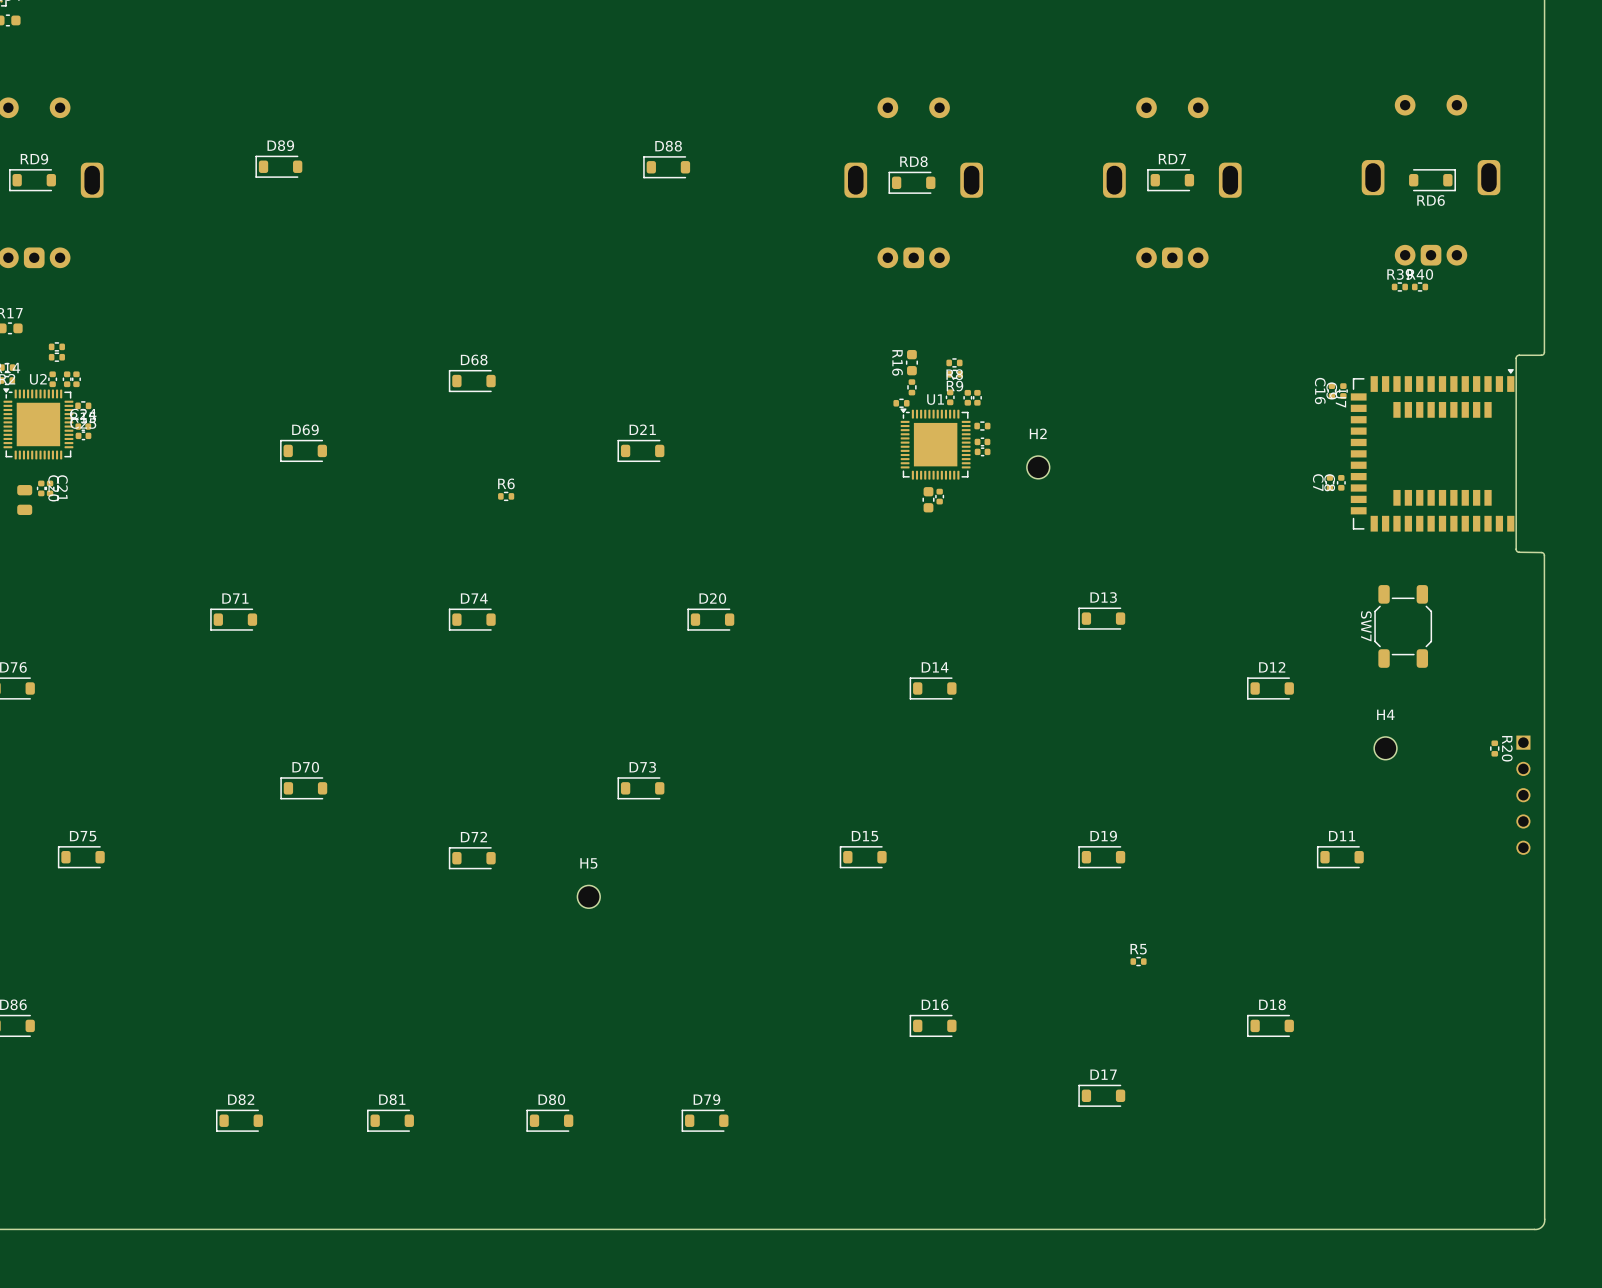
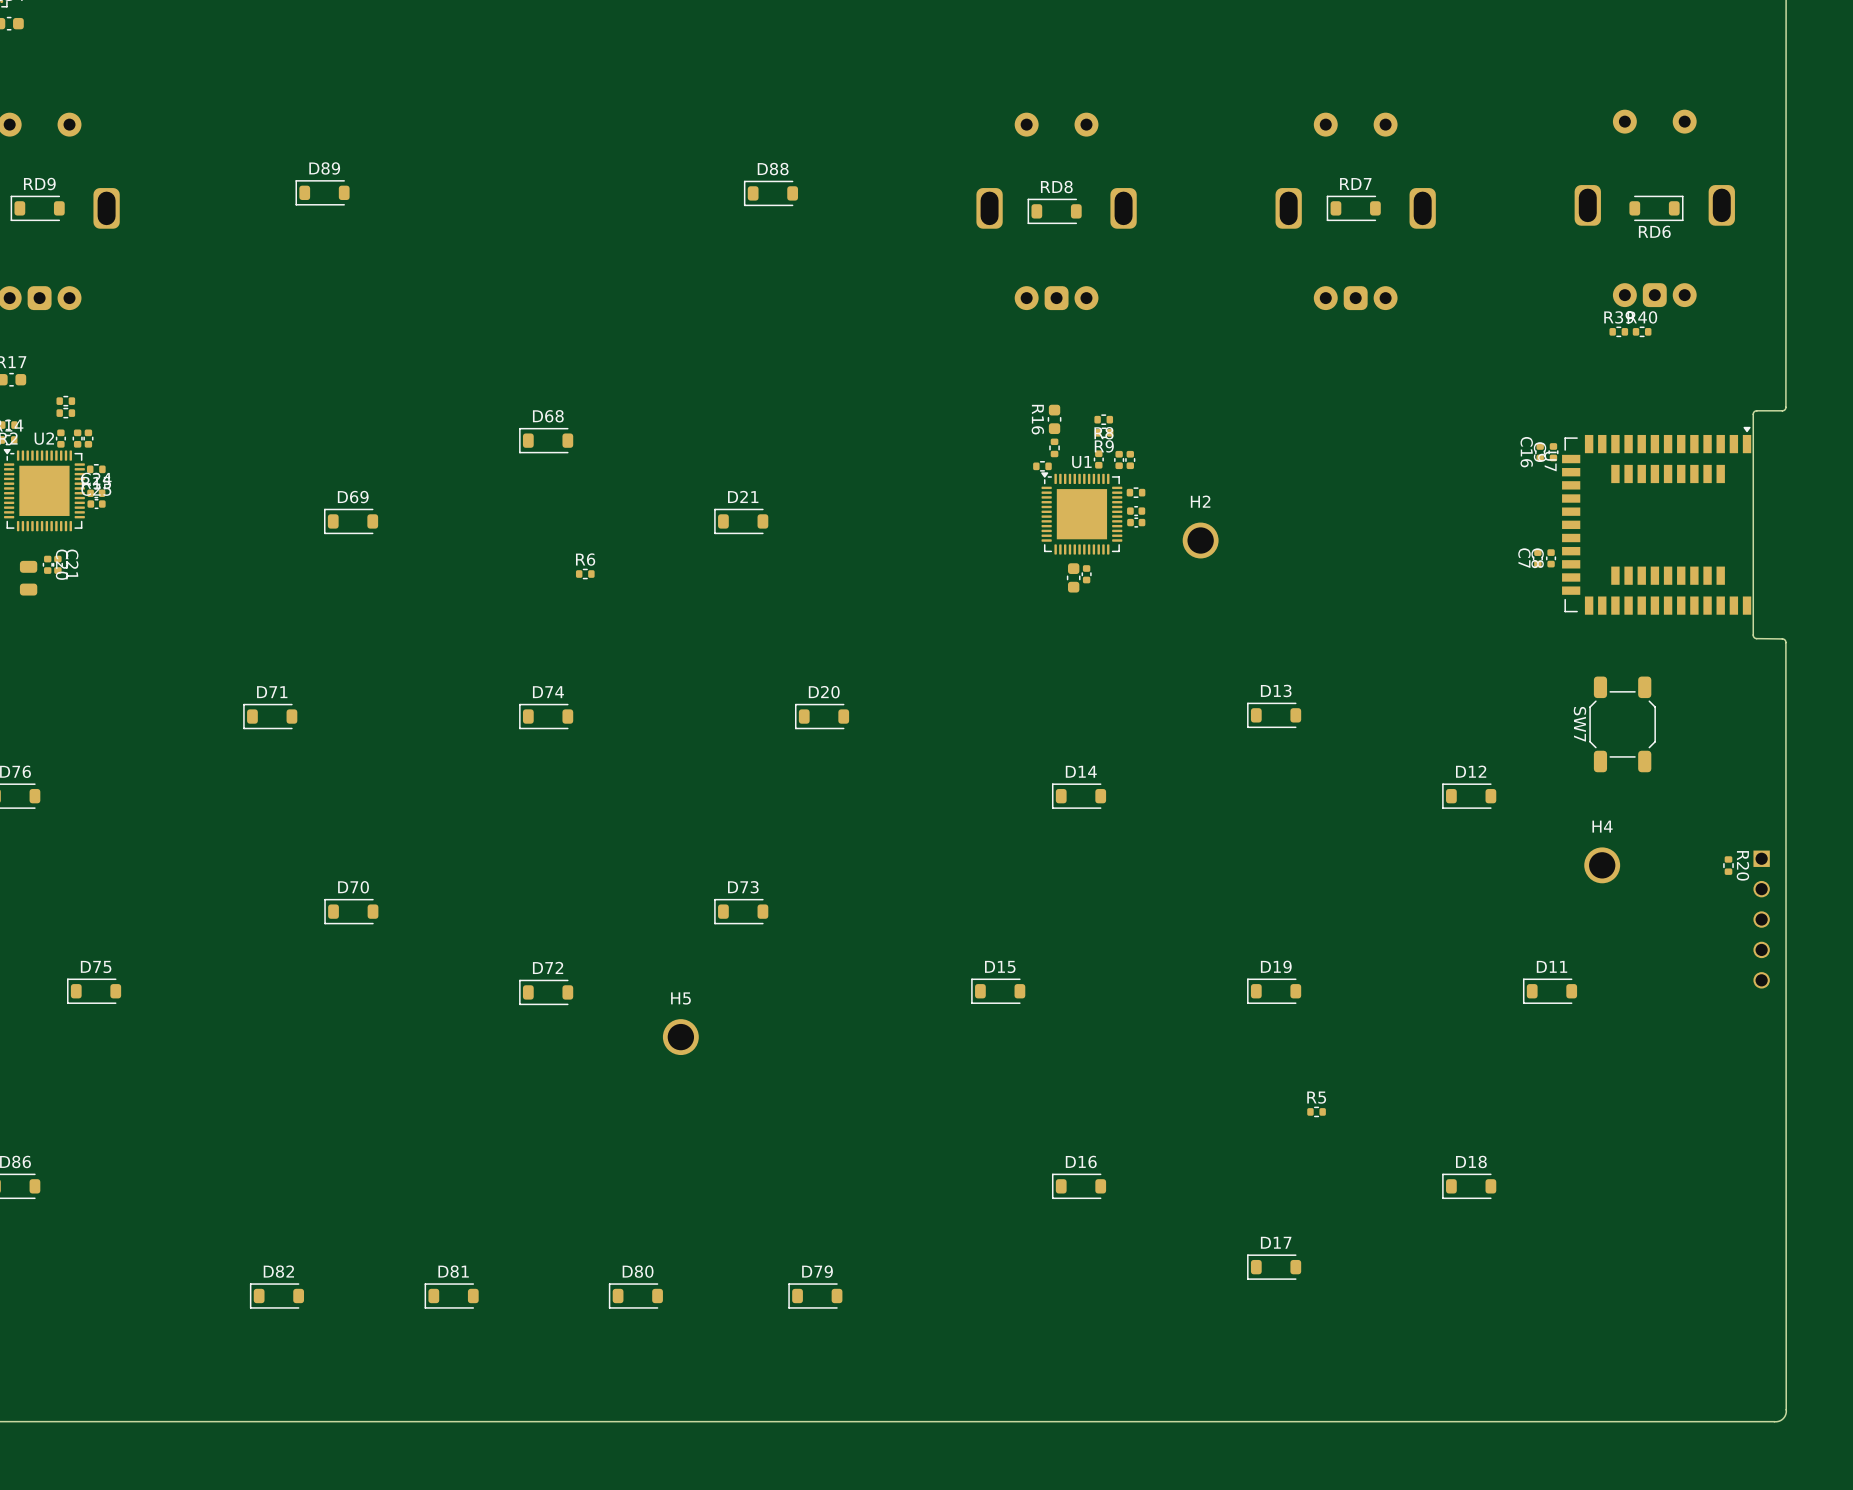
H2 footprint: [1026, 456, 1050, 479] -> [1182, 522, 1219, 559]
H4 footprint: [1374, 736, 1397, 760] -> [1584, 847, 1621, 884]
H5 footprint: [577, 885, 601, 909] -> [662, 1019, 699, 1056]

